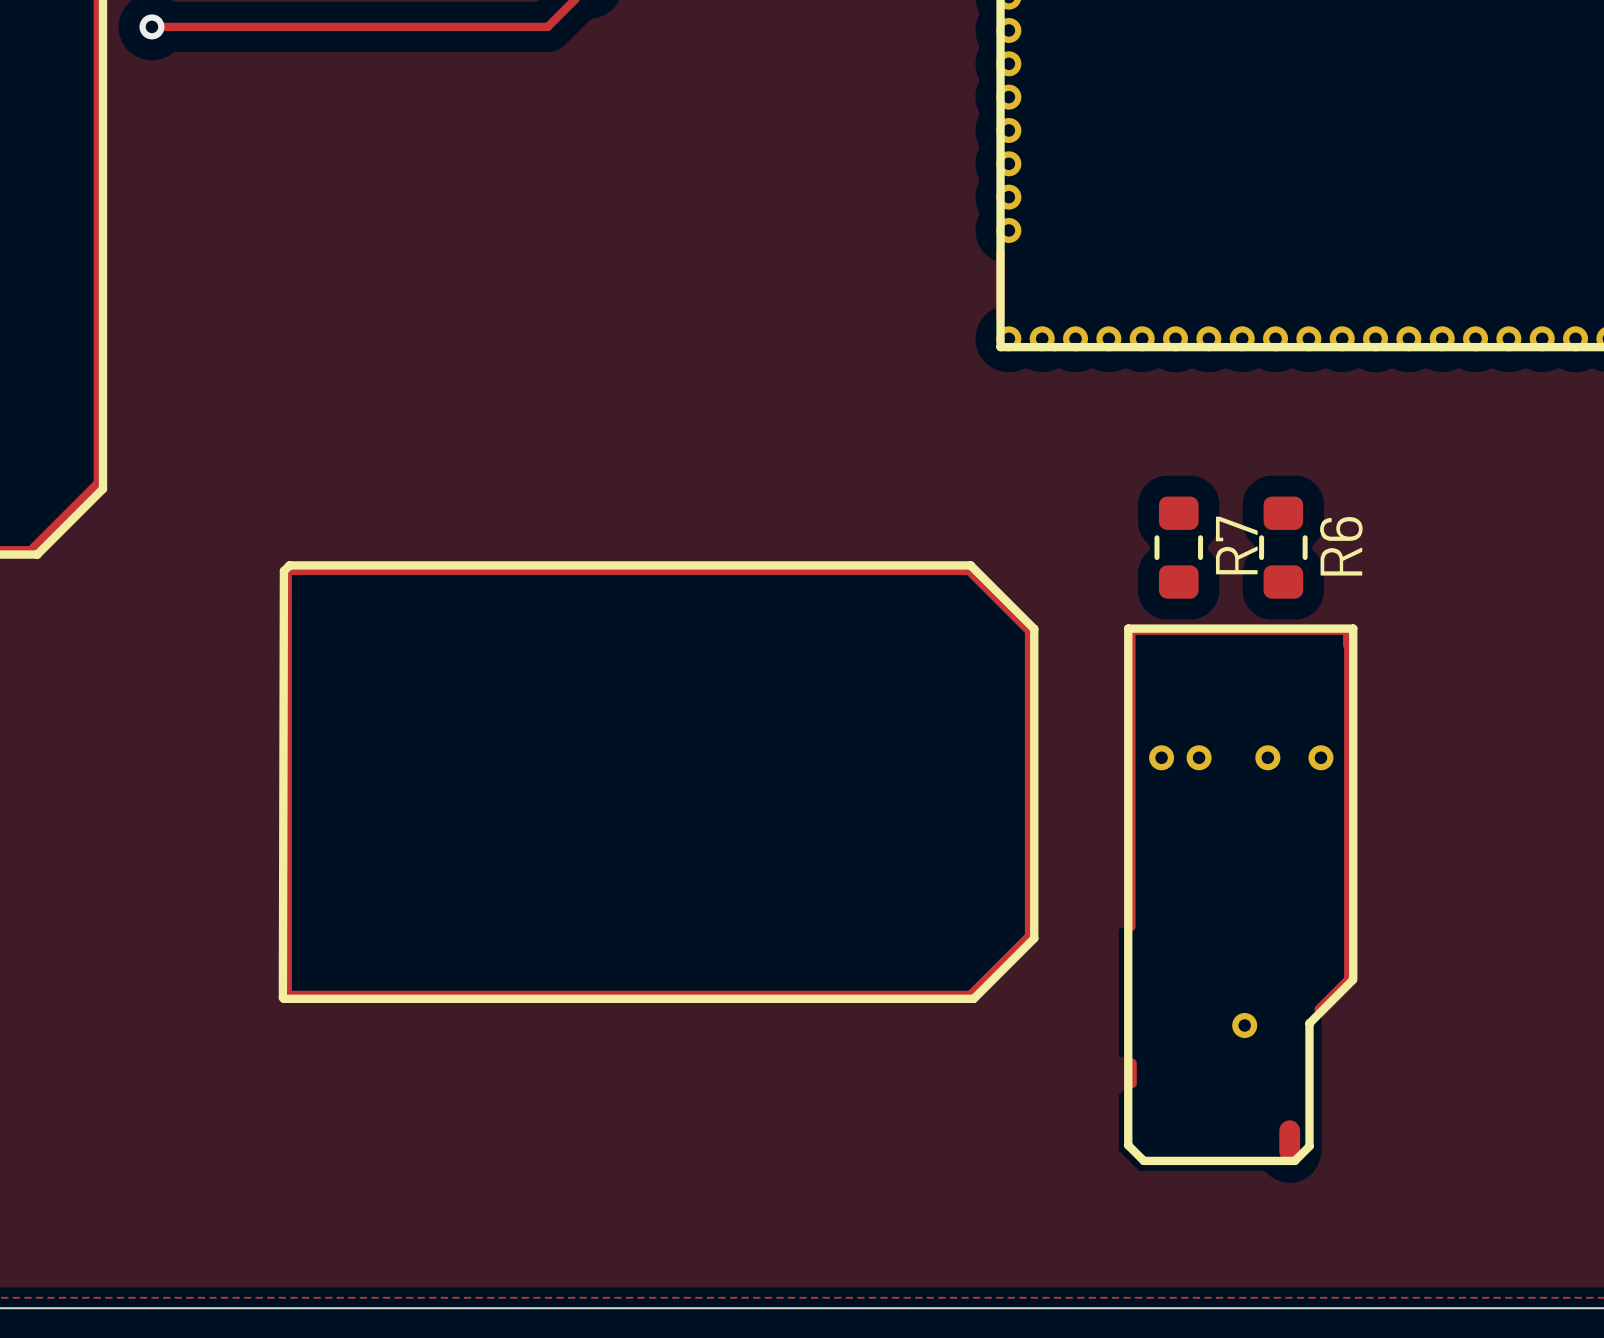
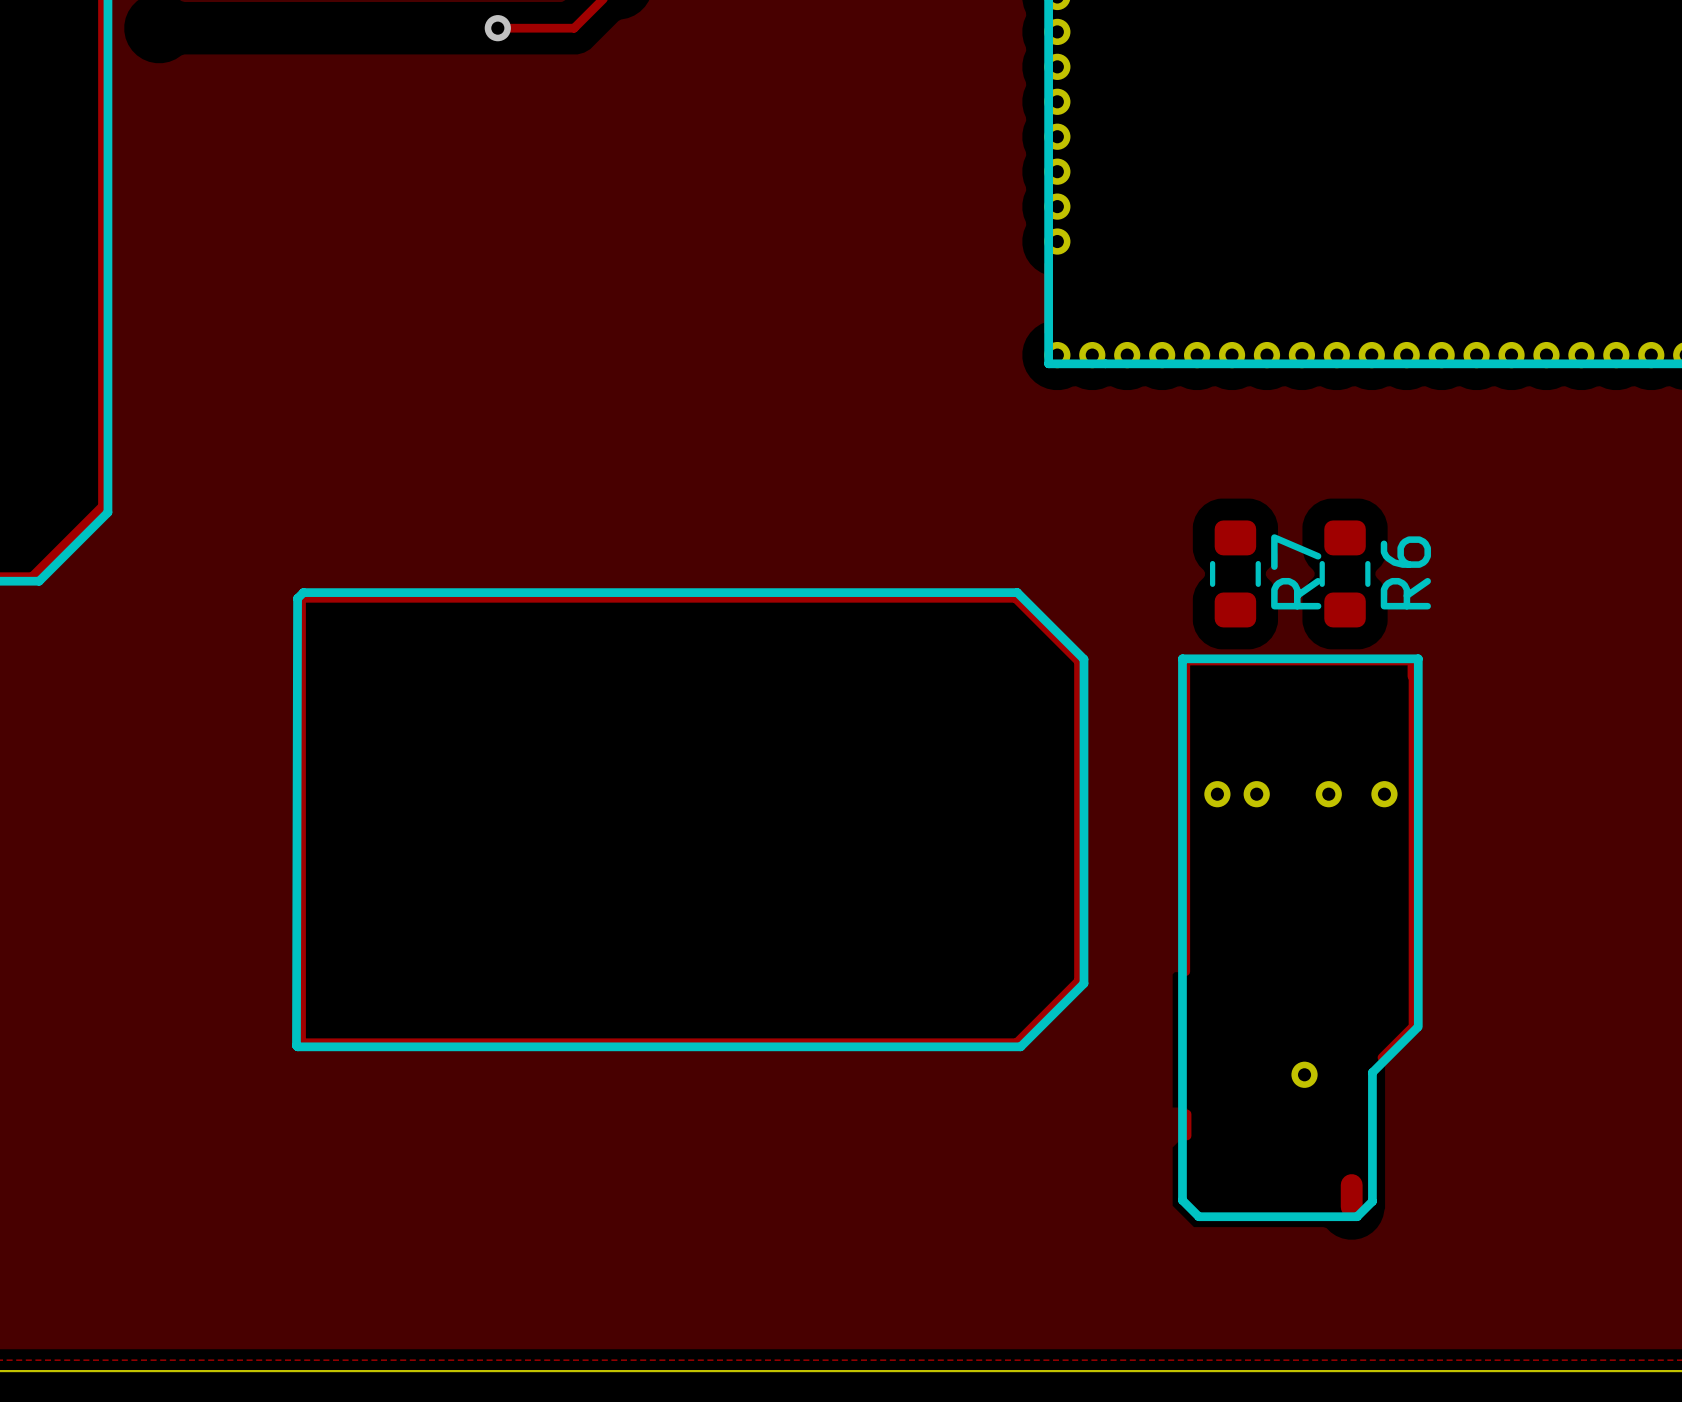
track: (151, 26) (475, 26) -> none
via: (151, 26) -> none
via: none -> (497, 28)

